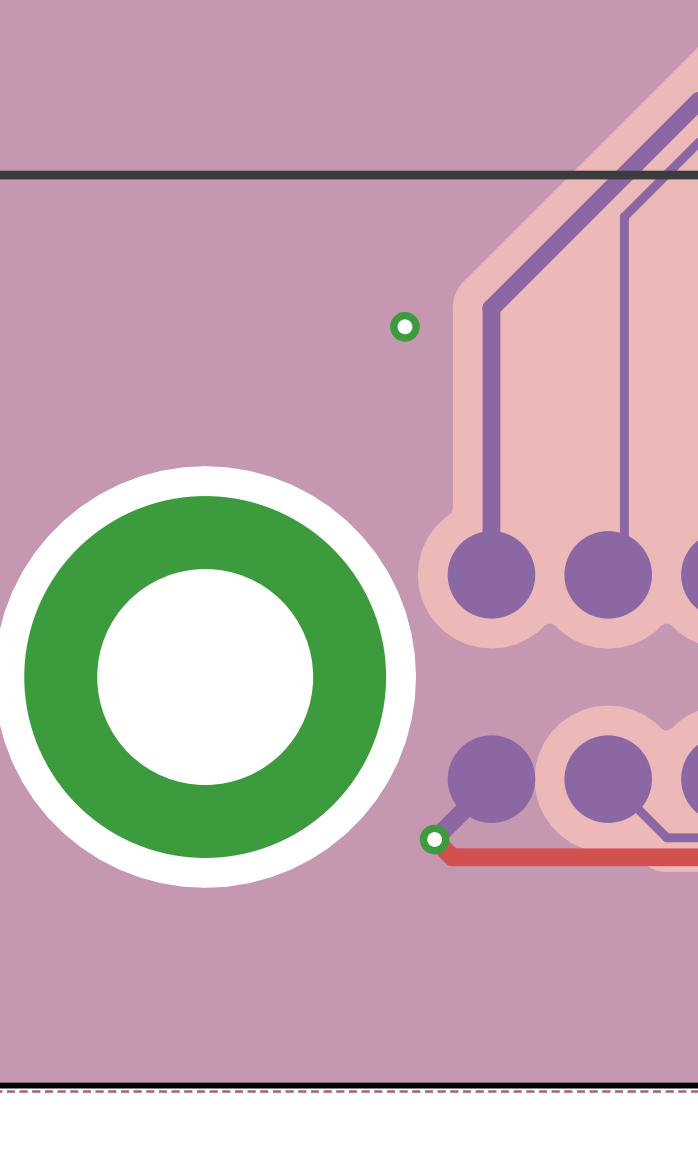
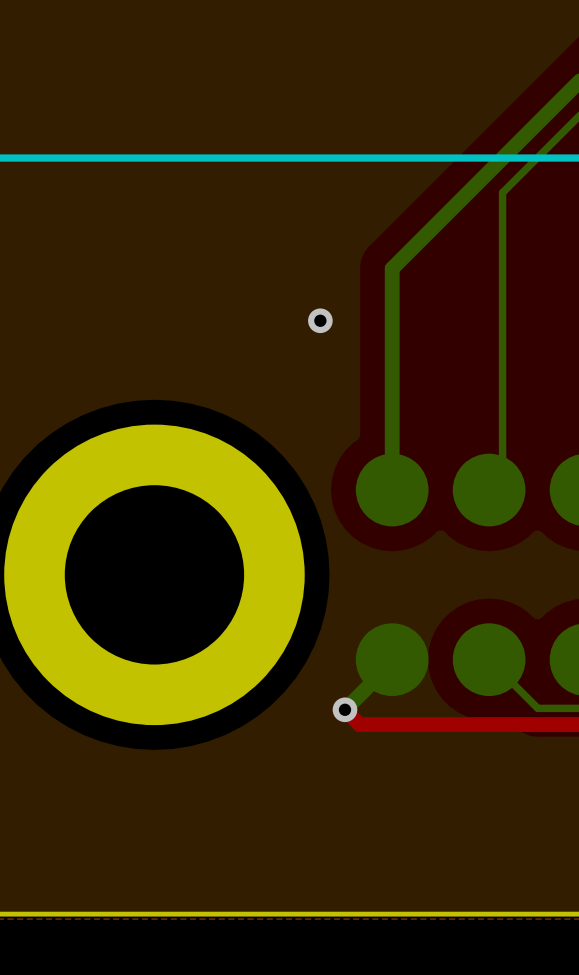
via position: (404, 326) -> (320, 320)

